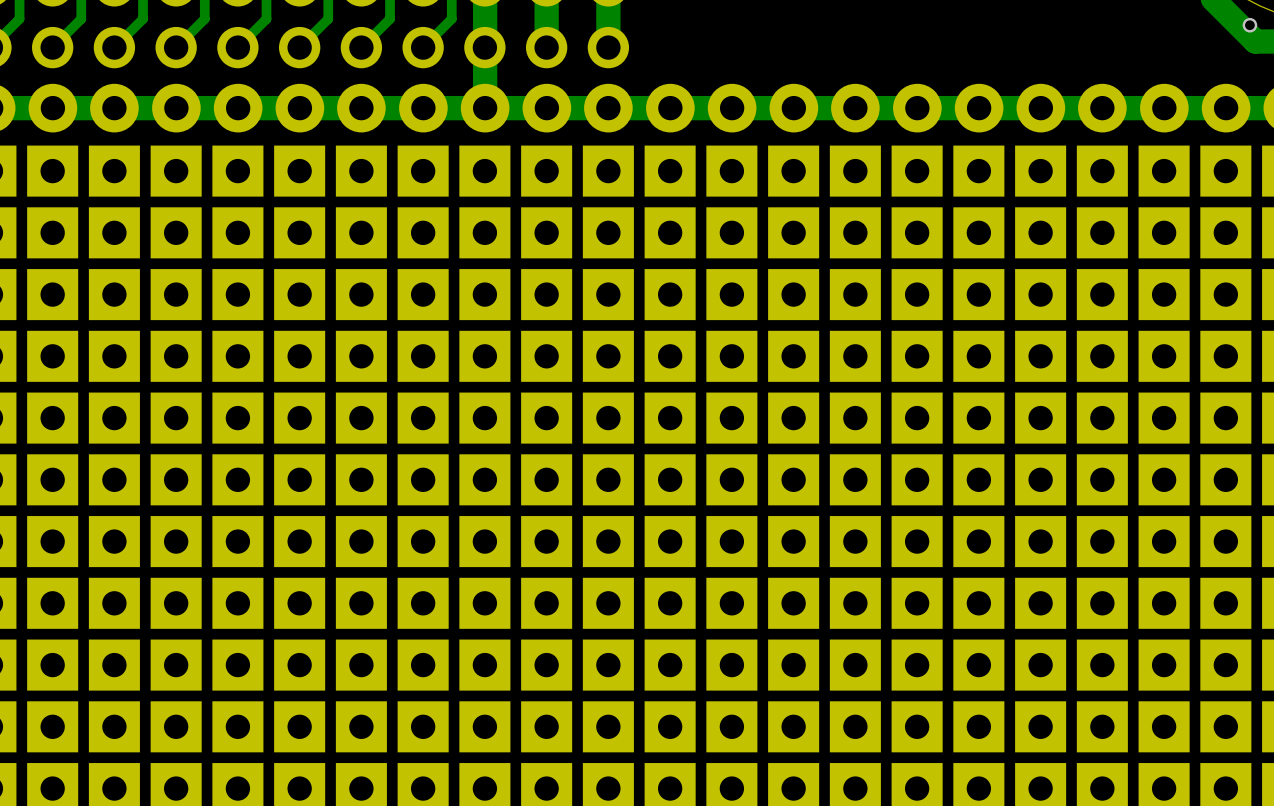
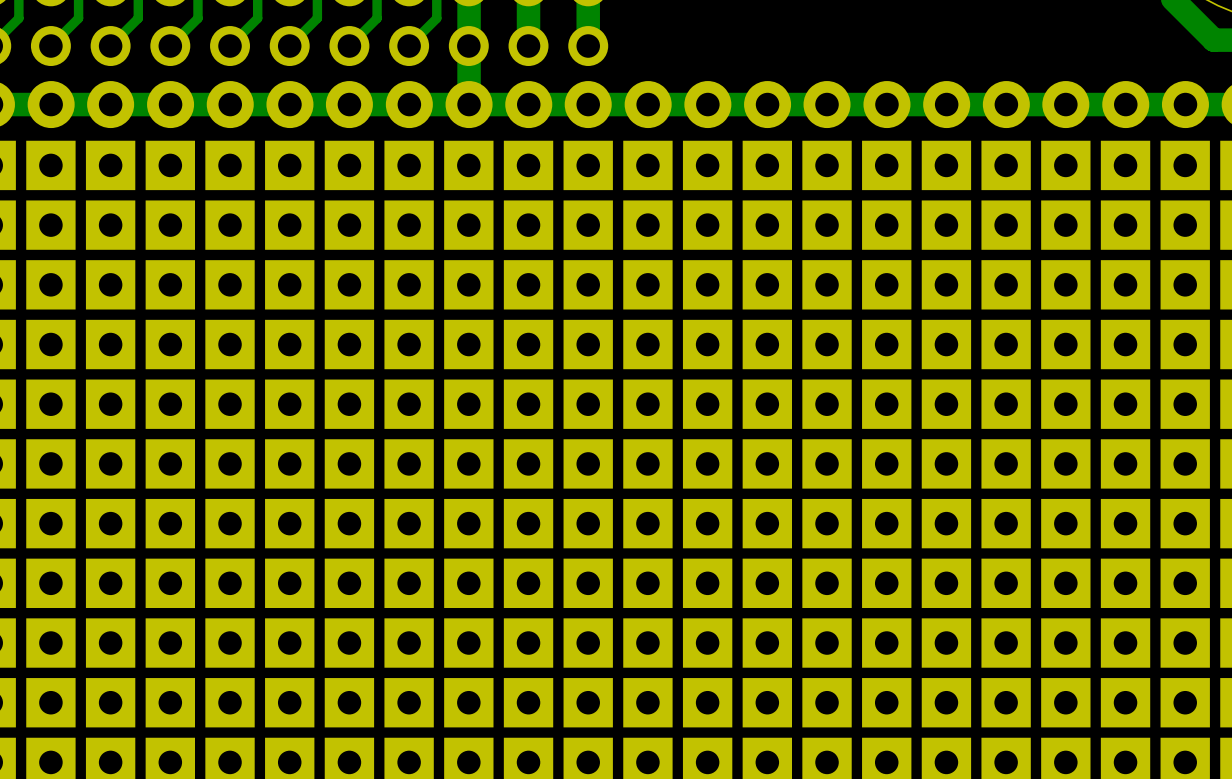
via: (1249, 25) -> none

